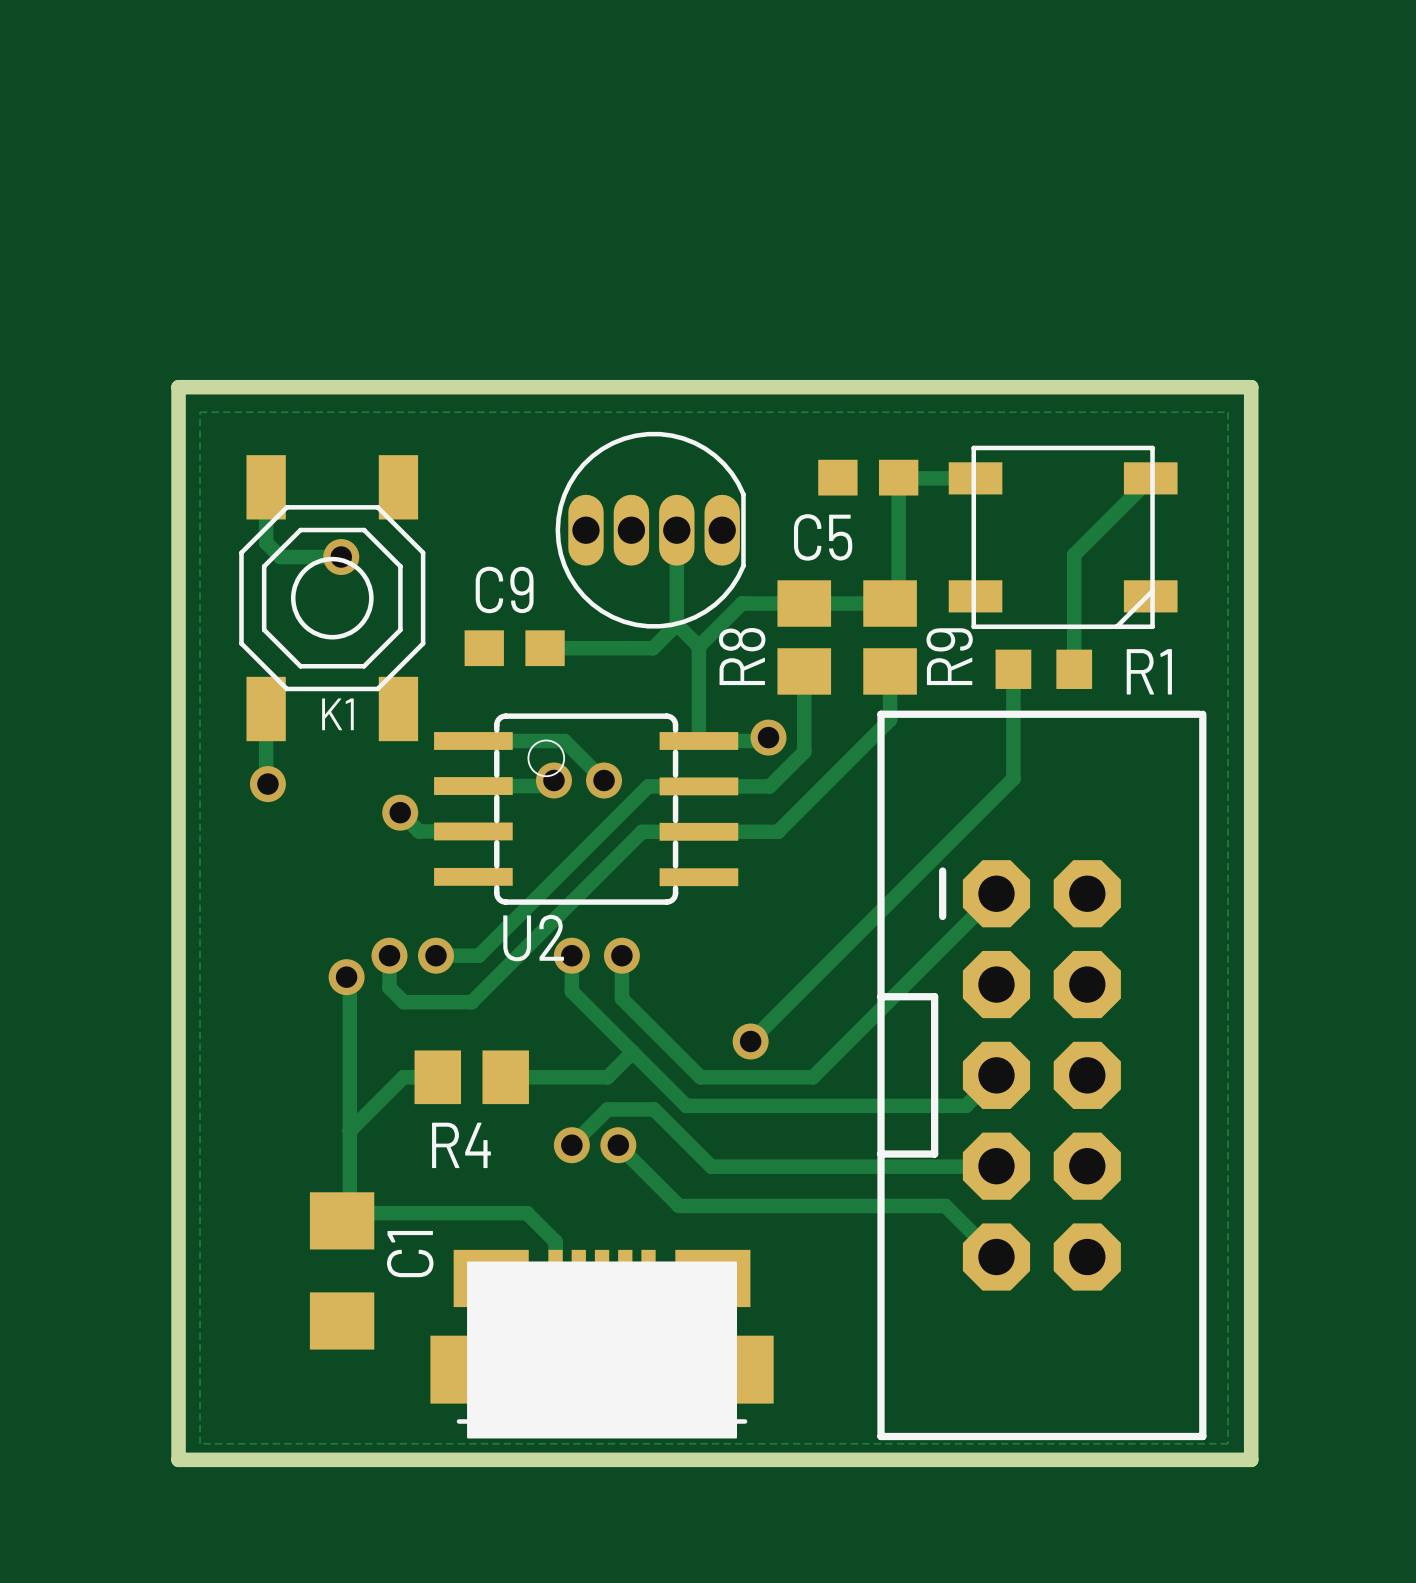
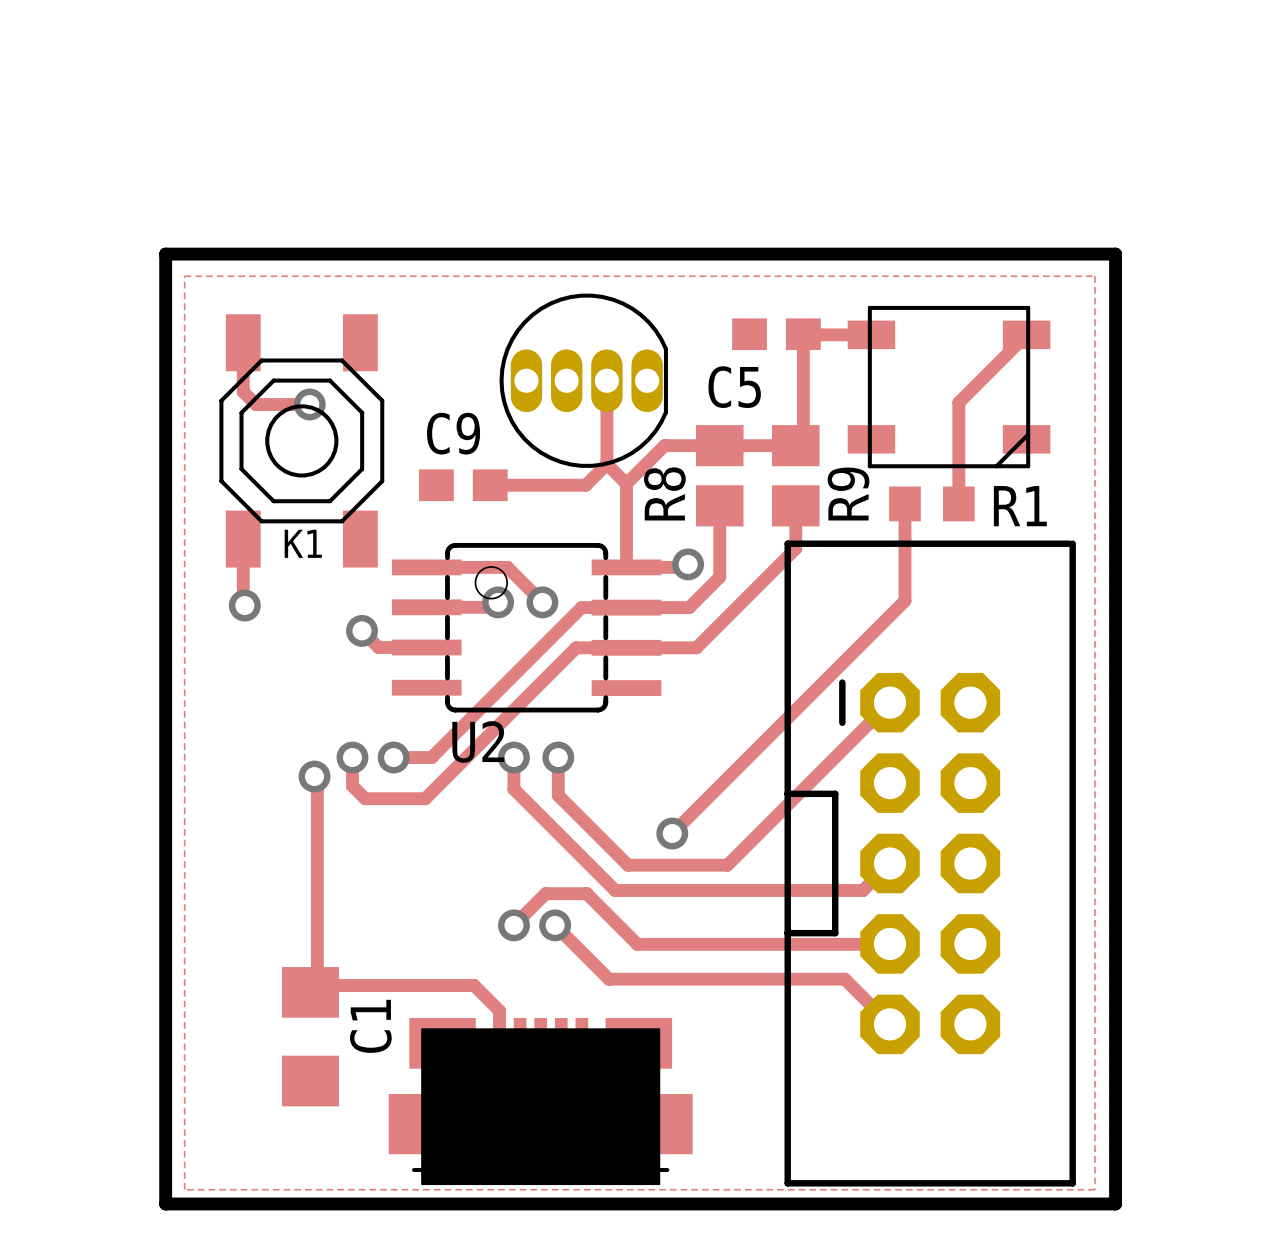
track: (632, 1052) (607, 1077) (505, 1077) -> none
track: (437, 1077) (403, 1077) (349, 1130) -> none
R4: (471, 1077) -> none

